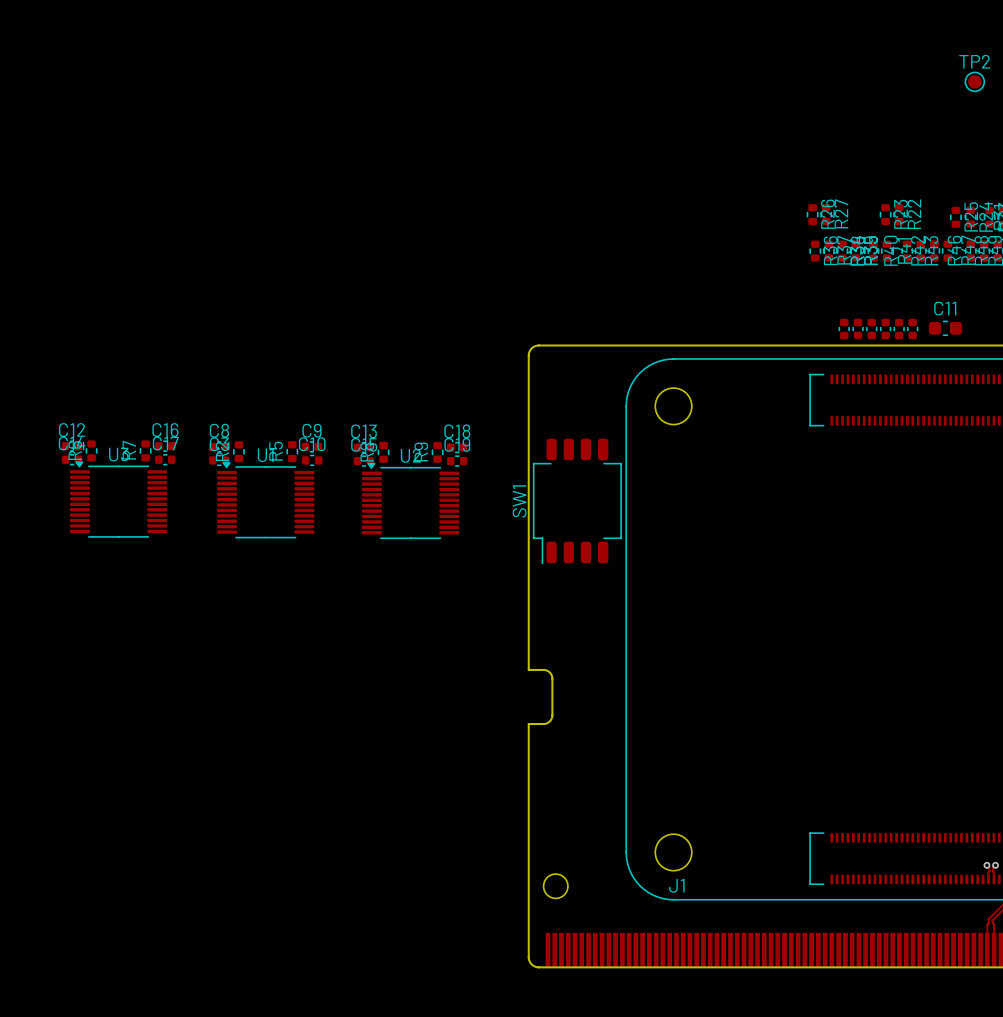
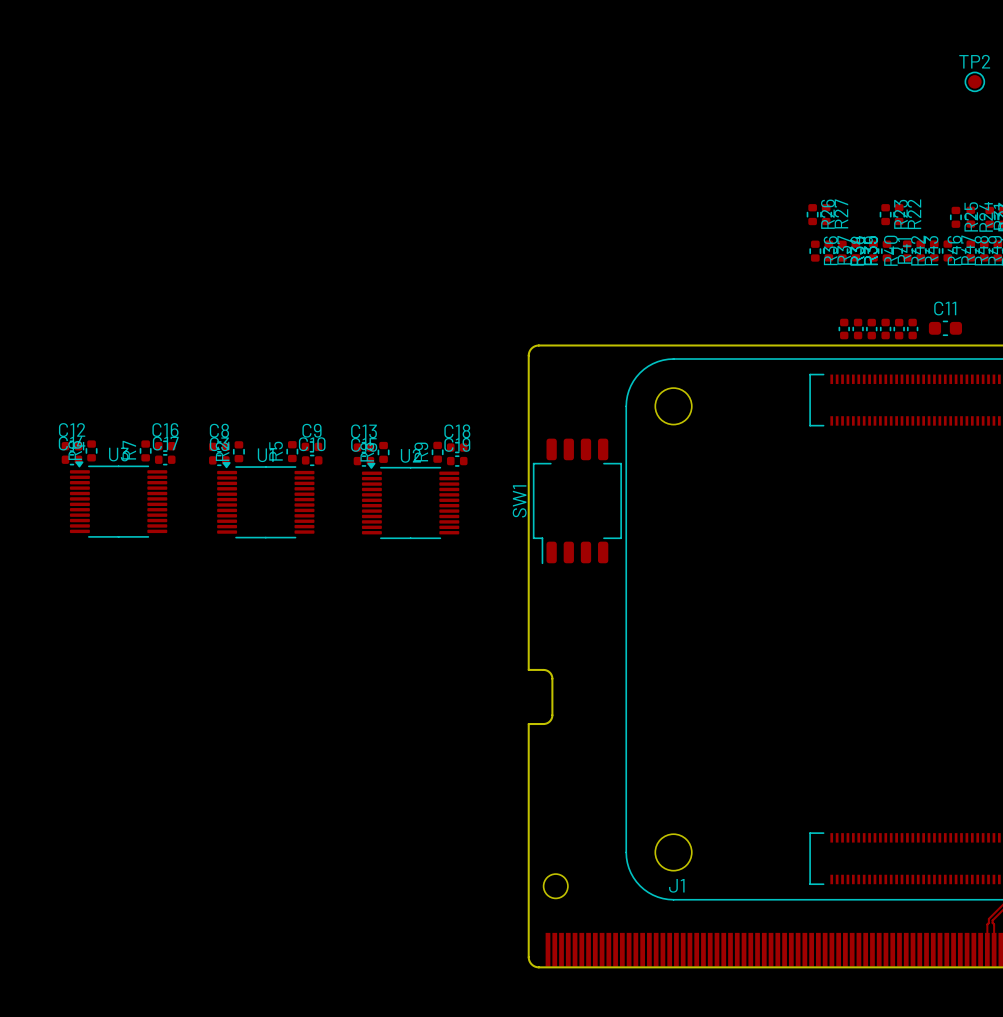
track: (986, 865) (989, 867) (988, 879) -> none
via: (986, 865) -> none
track: (995, 865) (993, 867) (993, 879) -> none
via: (995, 865) -> none

